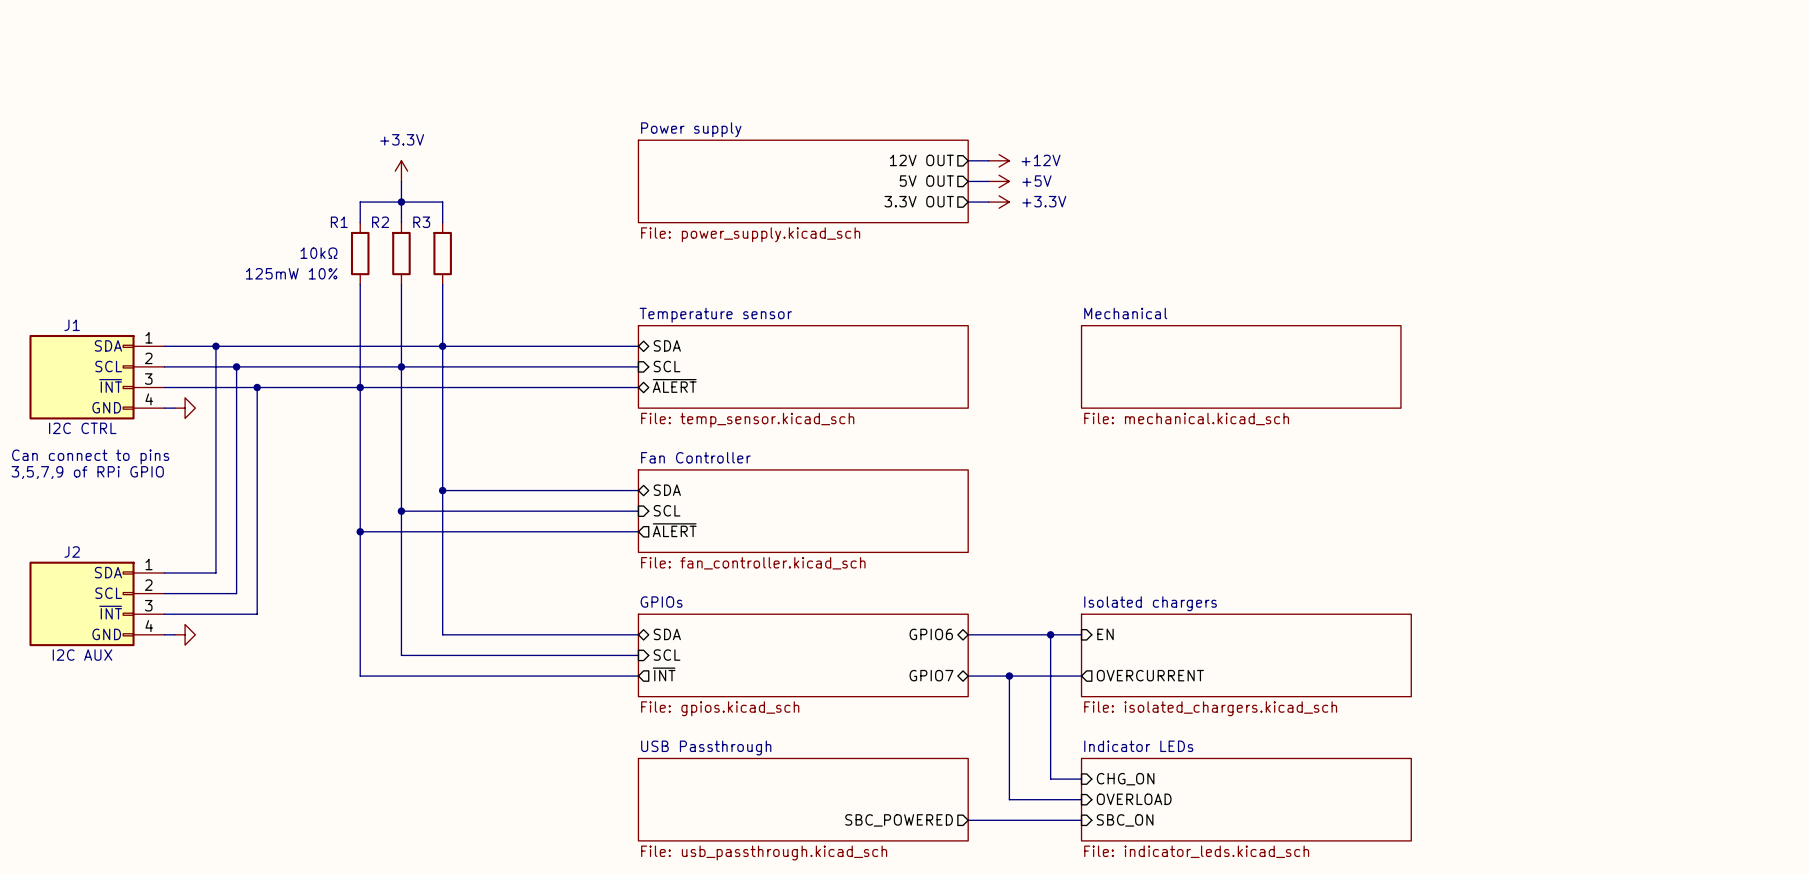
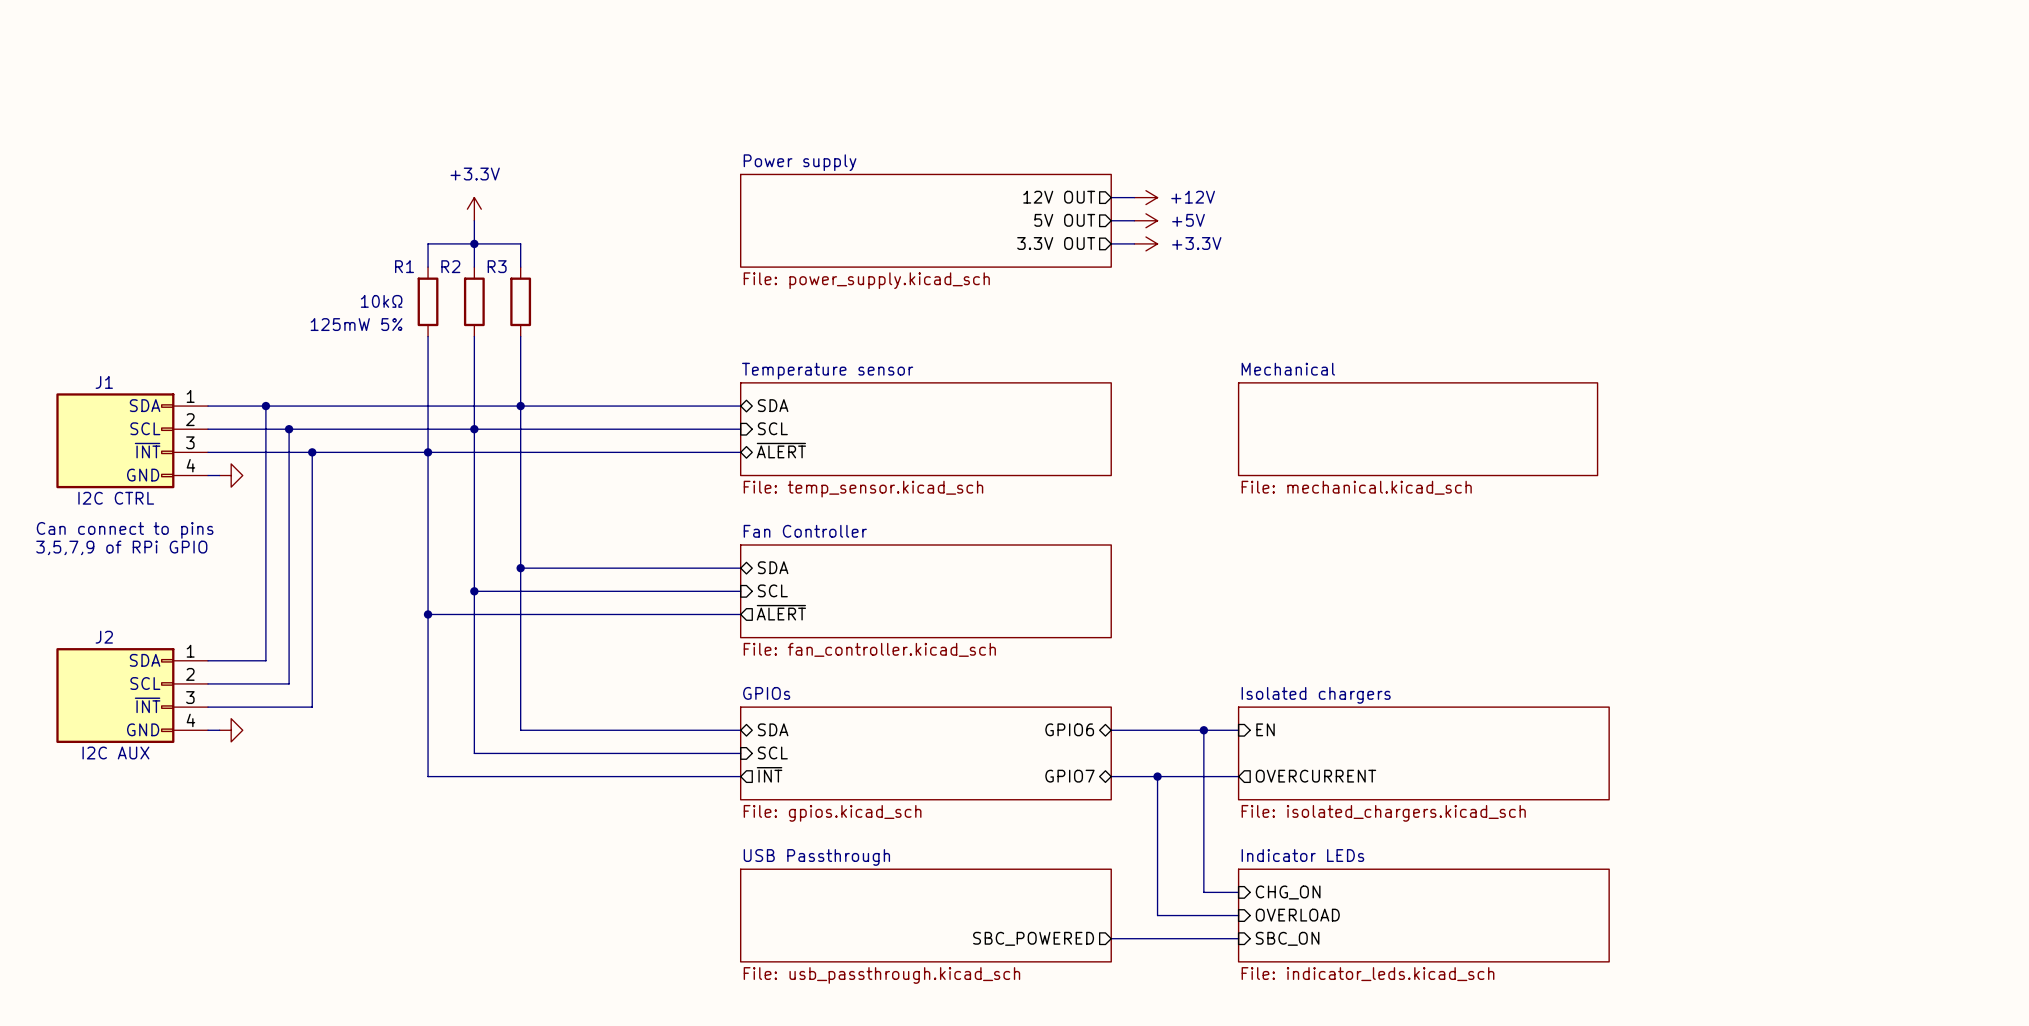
R1 text: 125mW 10% (291, 273) -> 125mW 5% (356, 324)

